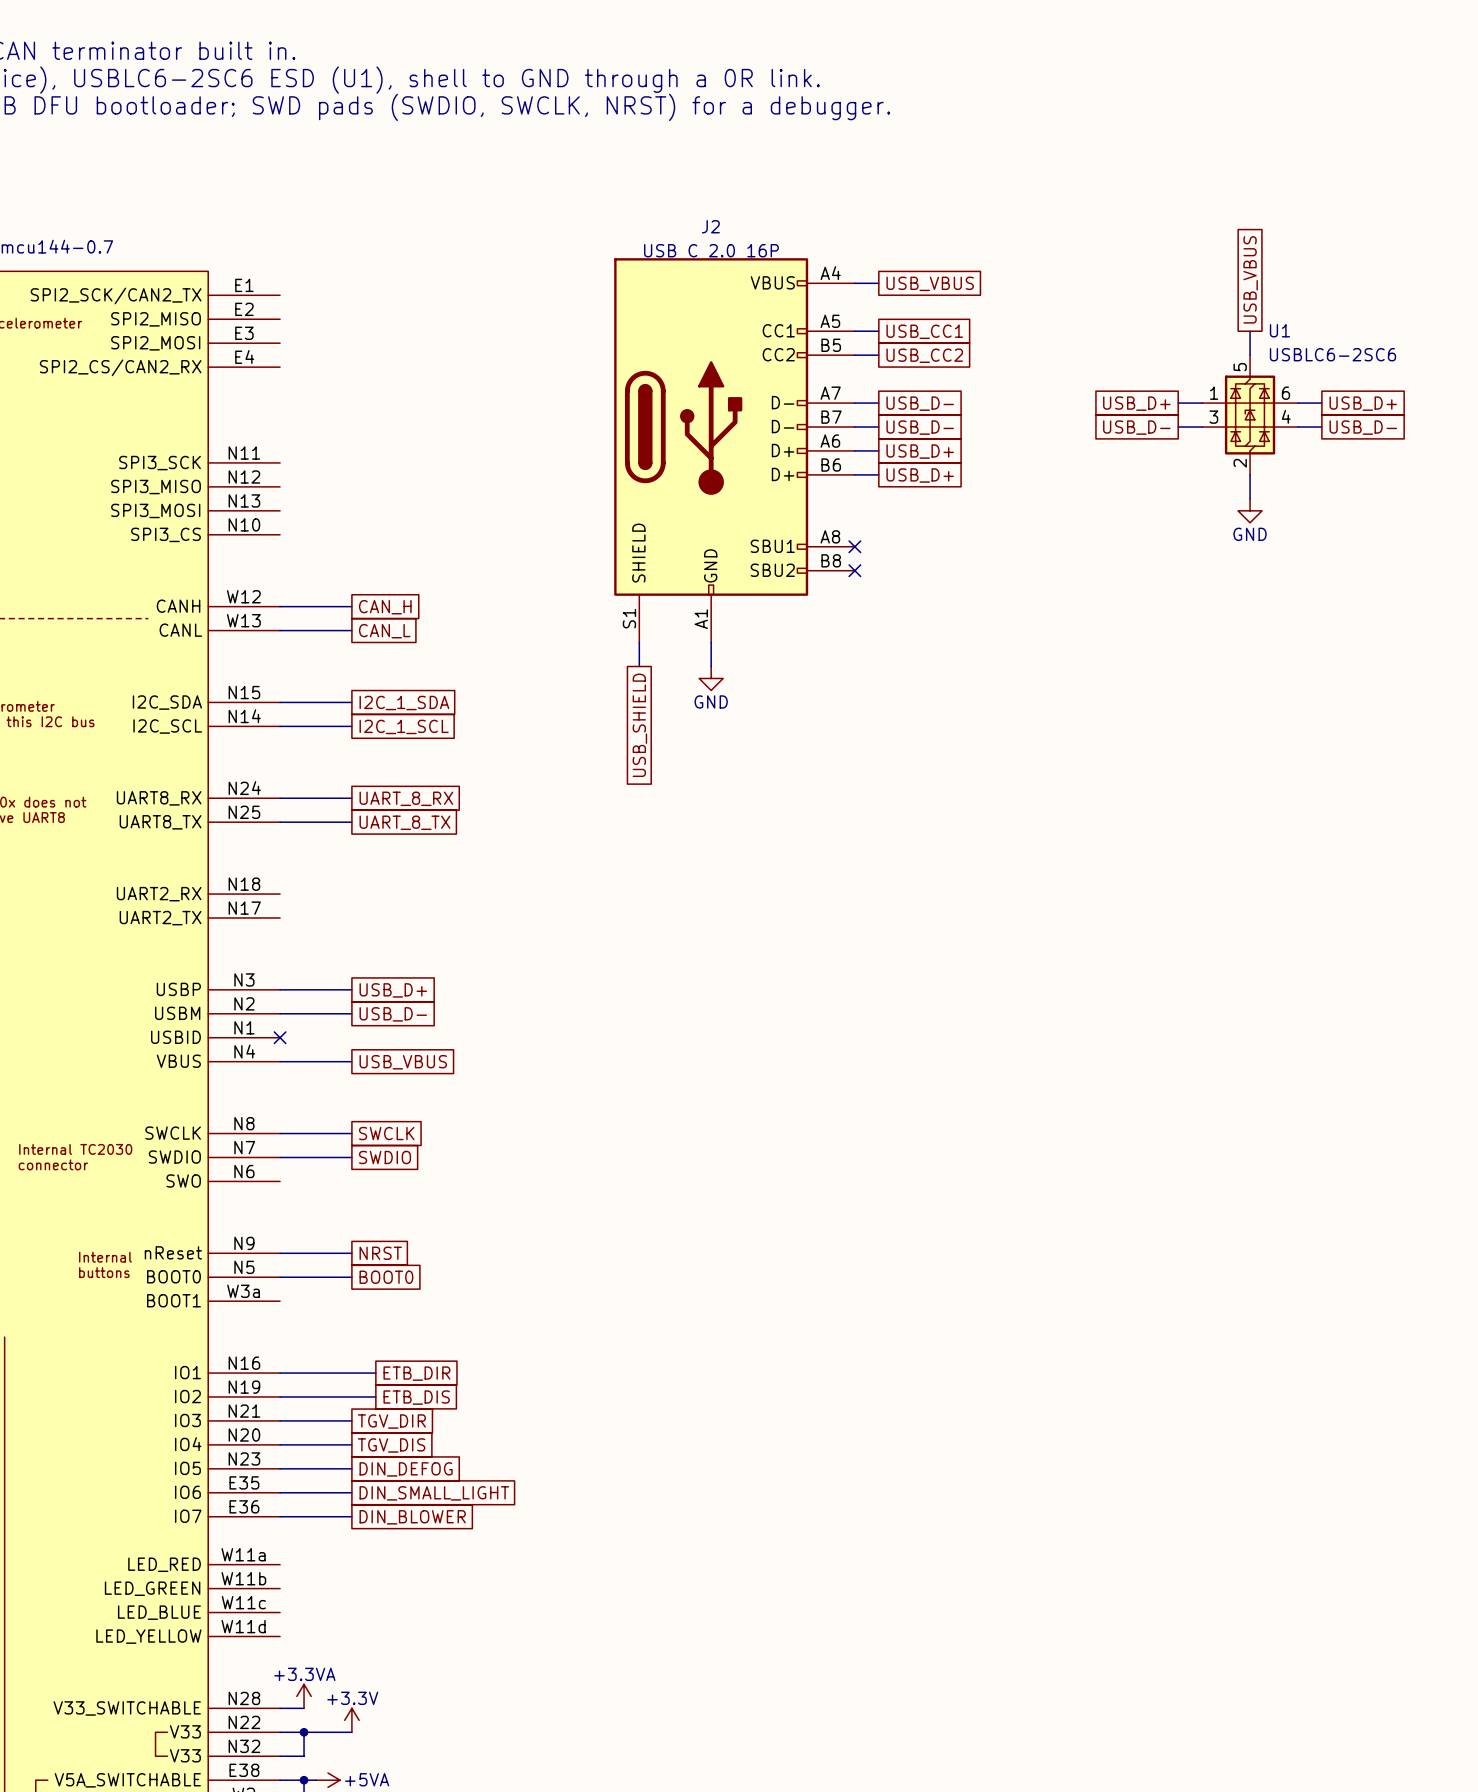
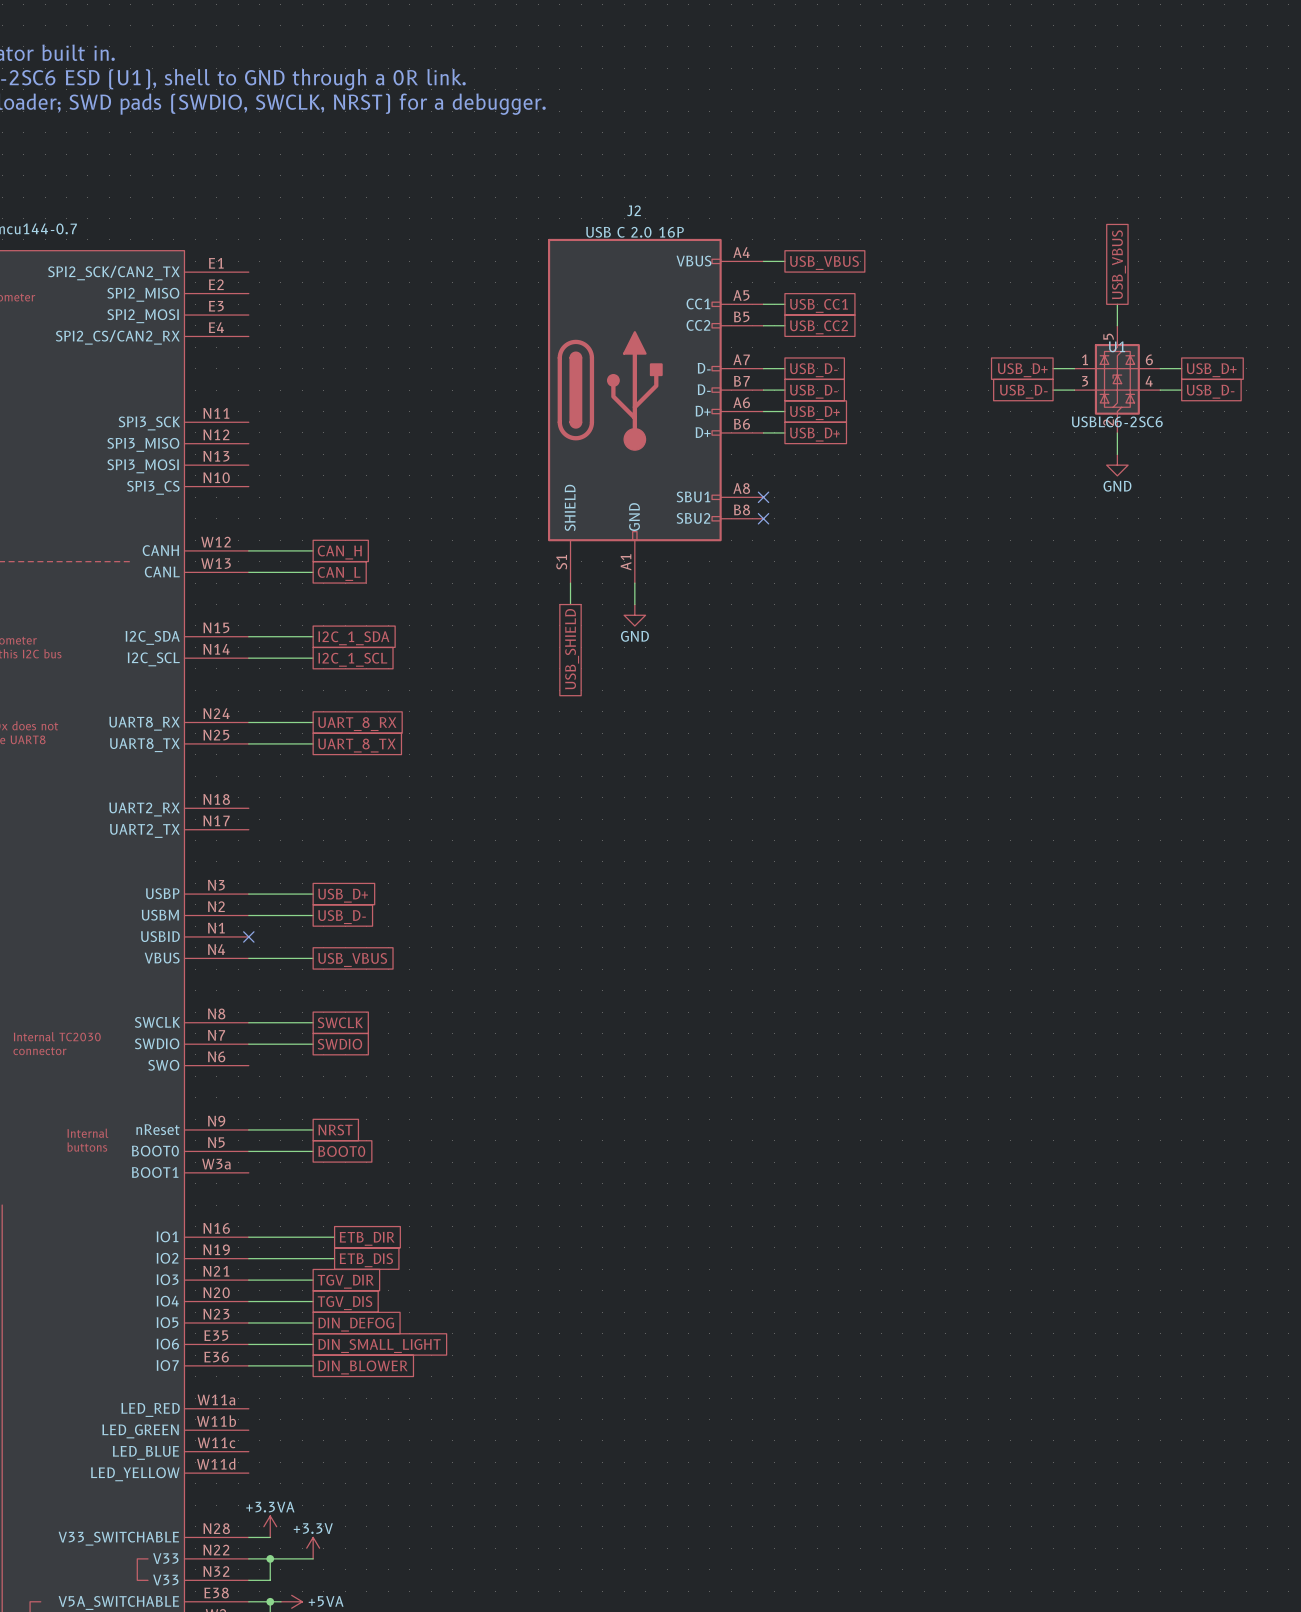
U1 name position: U1 (1279, 330) -> U1 (1117, 346)
U1 value position: USBLC6-2SC6 (1332, 354) -> USBLC6-2SC6 (1117, 421)

